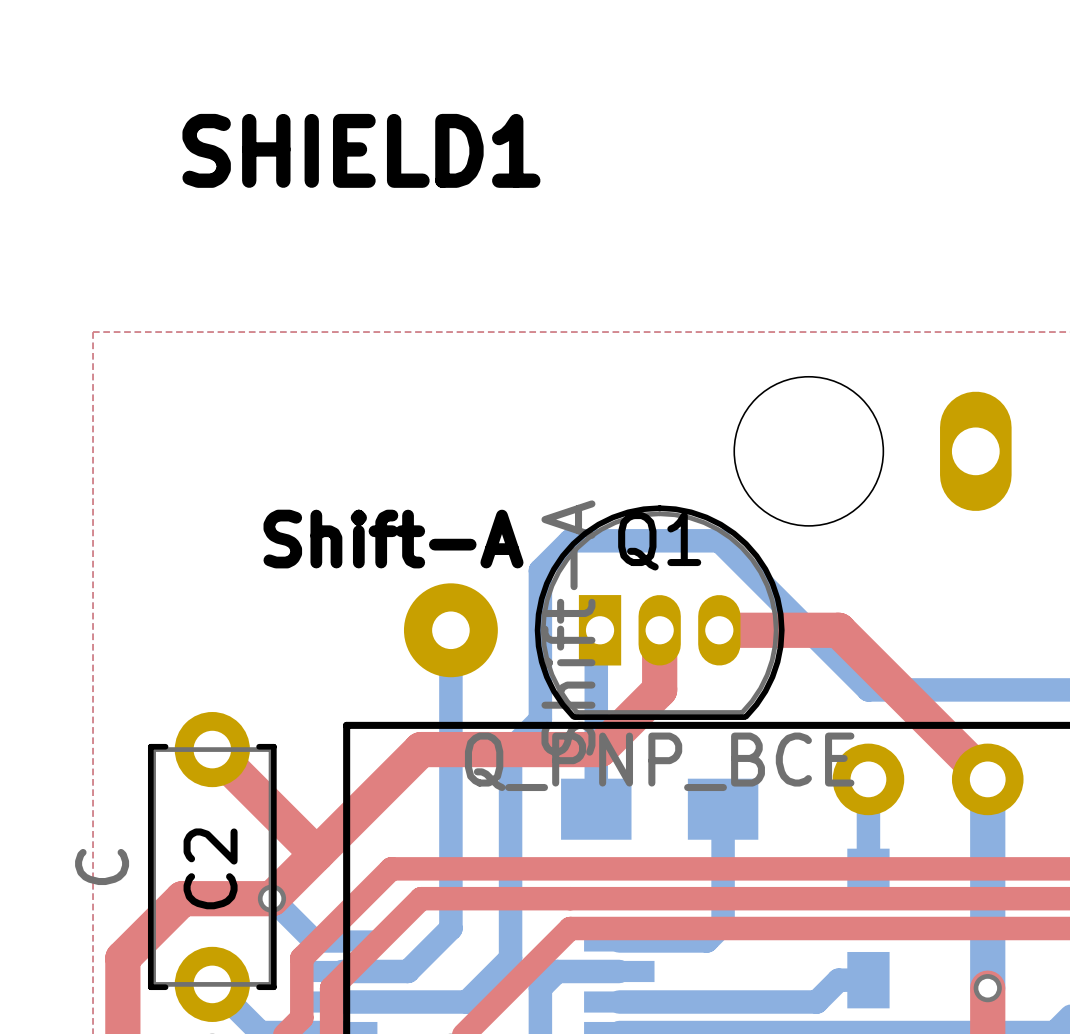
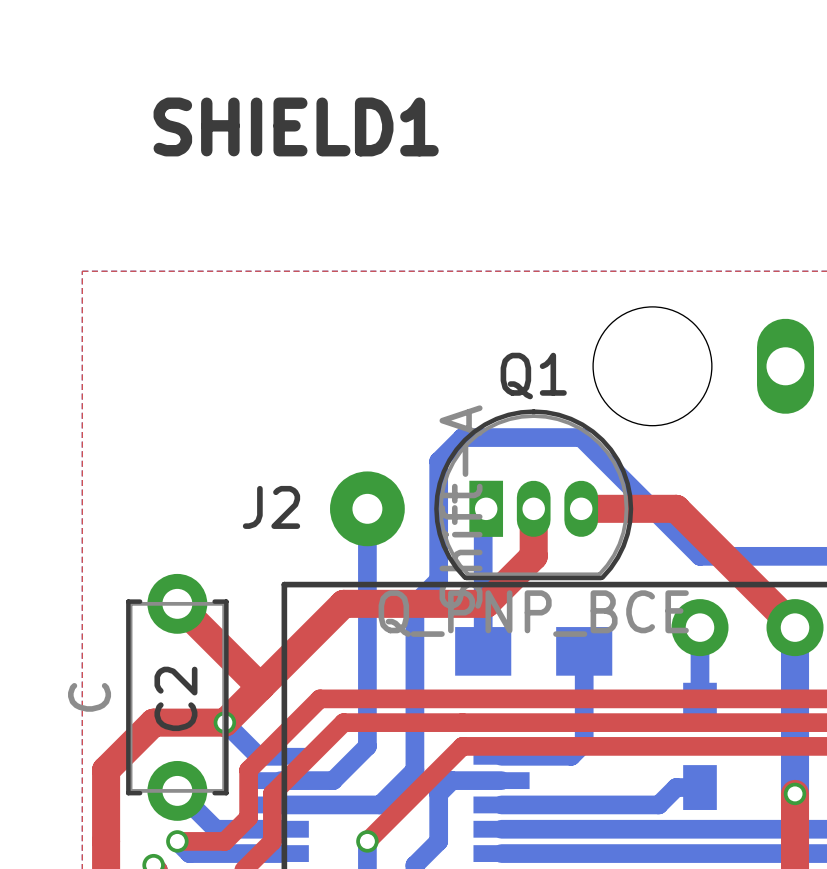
text: Shift-A (393, 539) -> none
Q1 name position: Q1 (659, 541) -> Q1 (533, 376)
J2 name: none -> J2 (271, 507)

